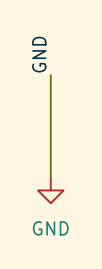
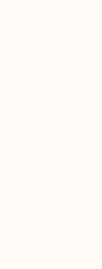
label: GND (39, 54) -> none
wire: (50, 75) (50, 177) -> none
power symbol: GND (50, 190) -> none

